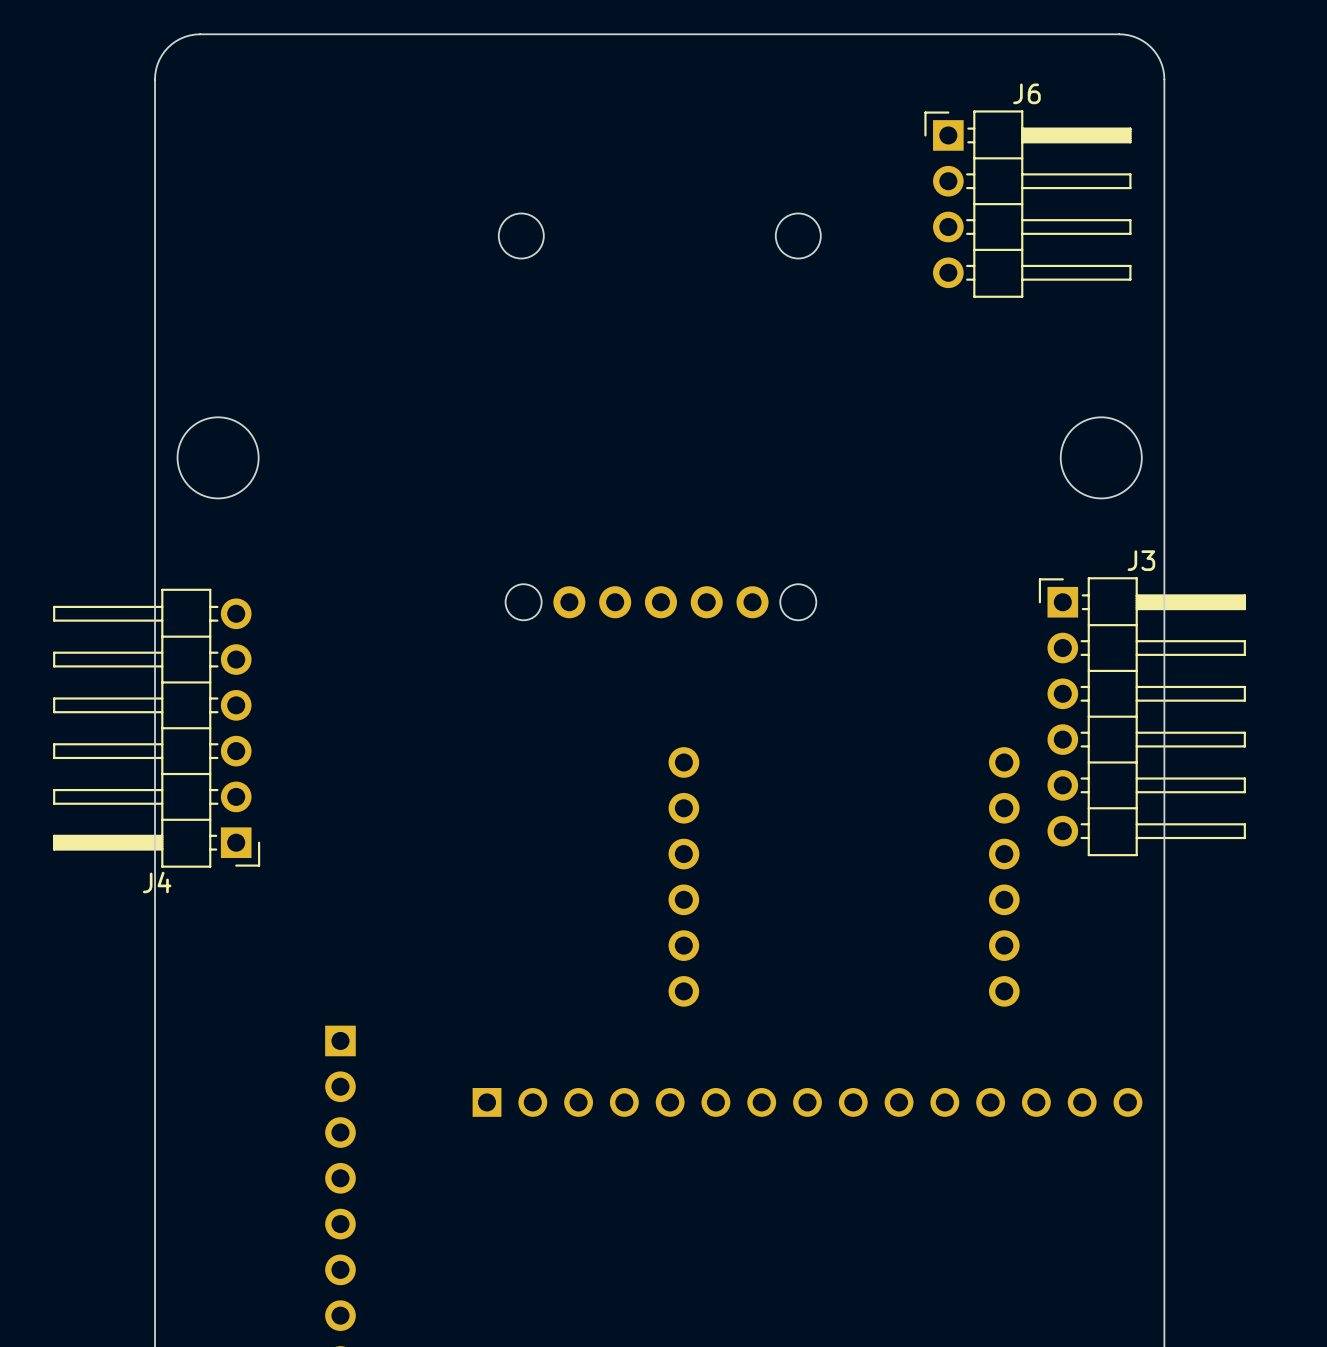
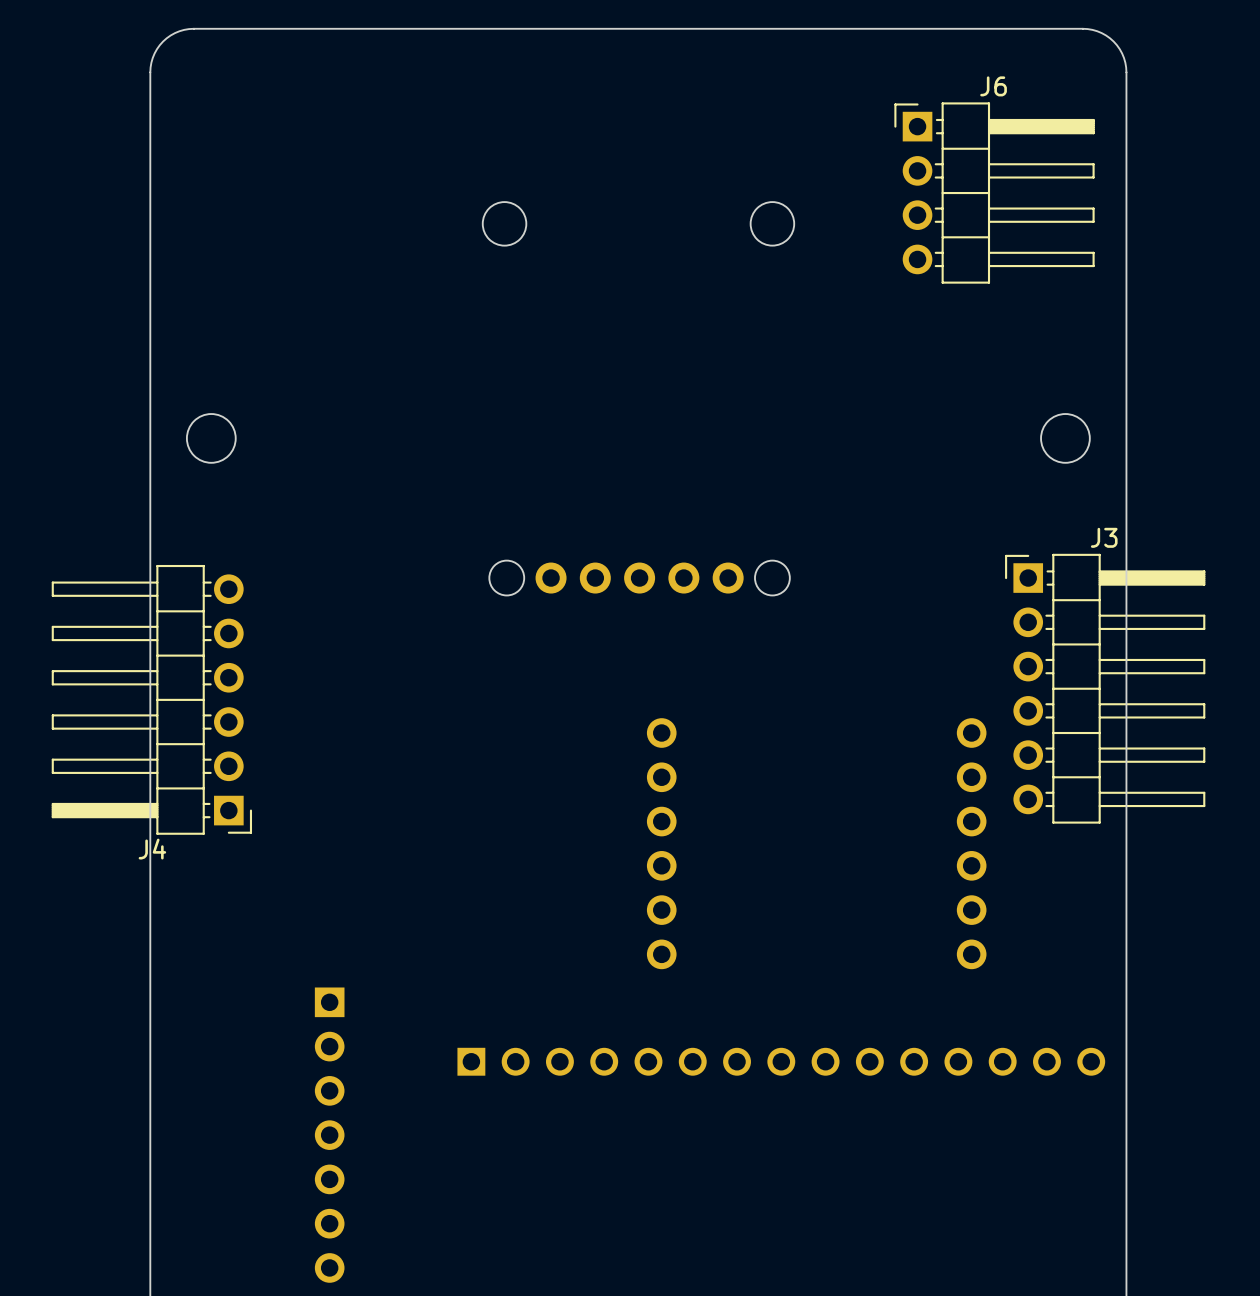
round board edge size: [176, 416, 260, 500] -> [186, 413, 237, 464]
round board edge size: [1059, 416, 1143, 500] -> [1040, 413, 1091, 464]

